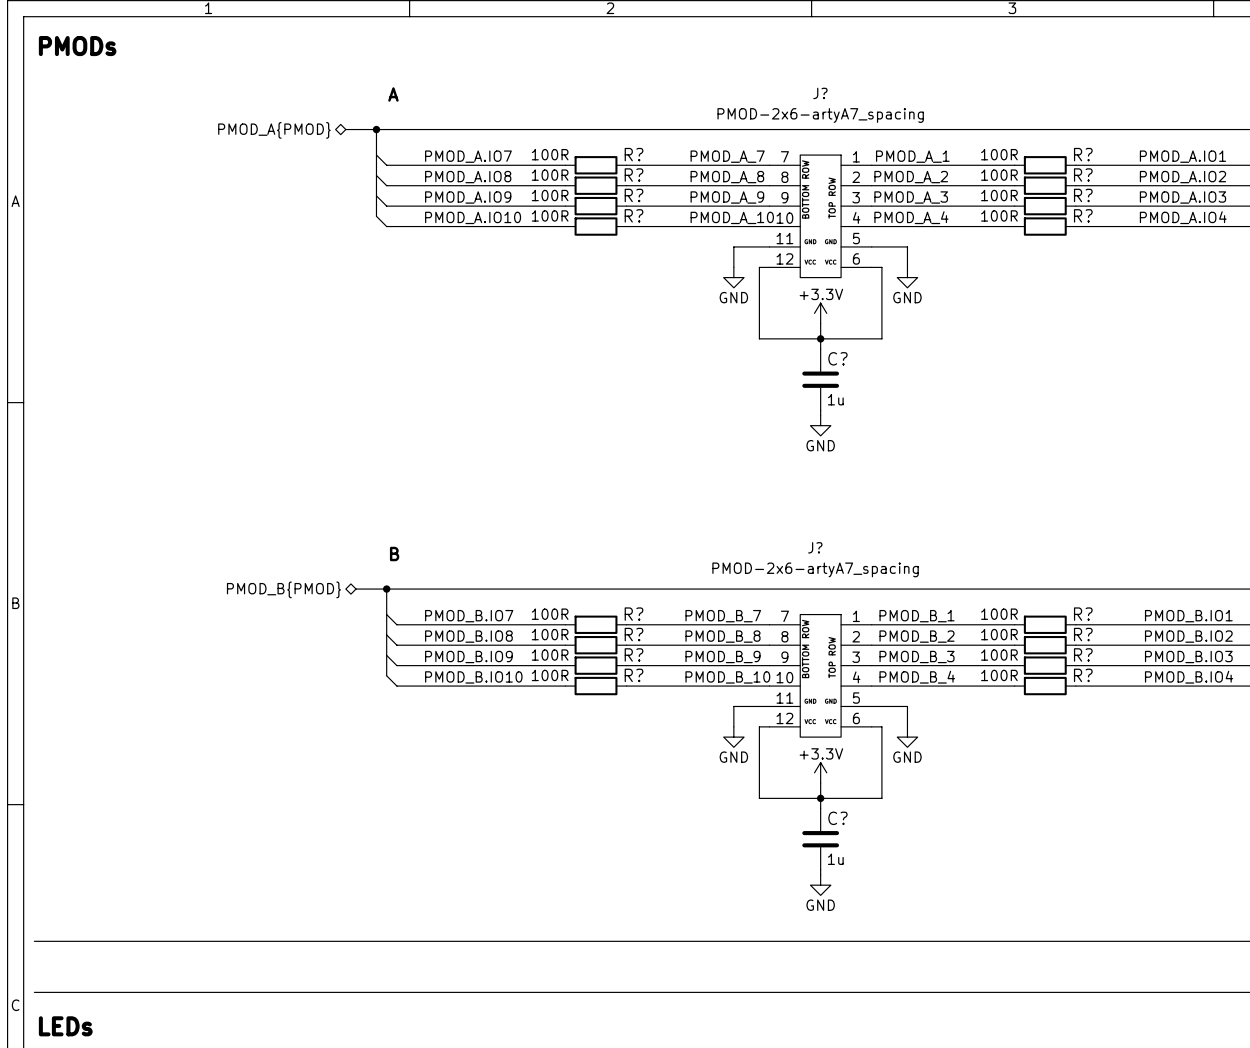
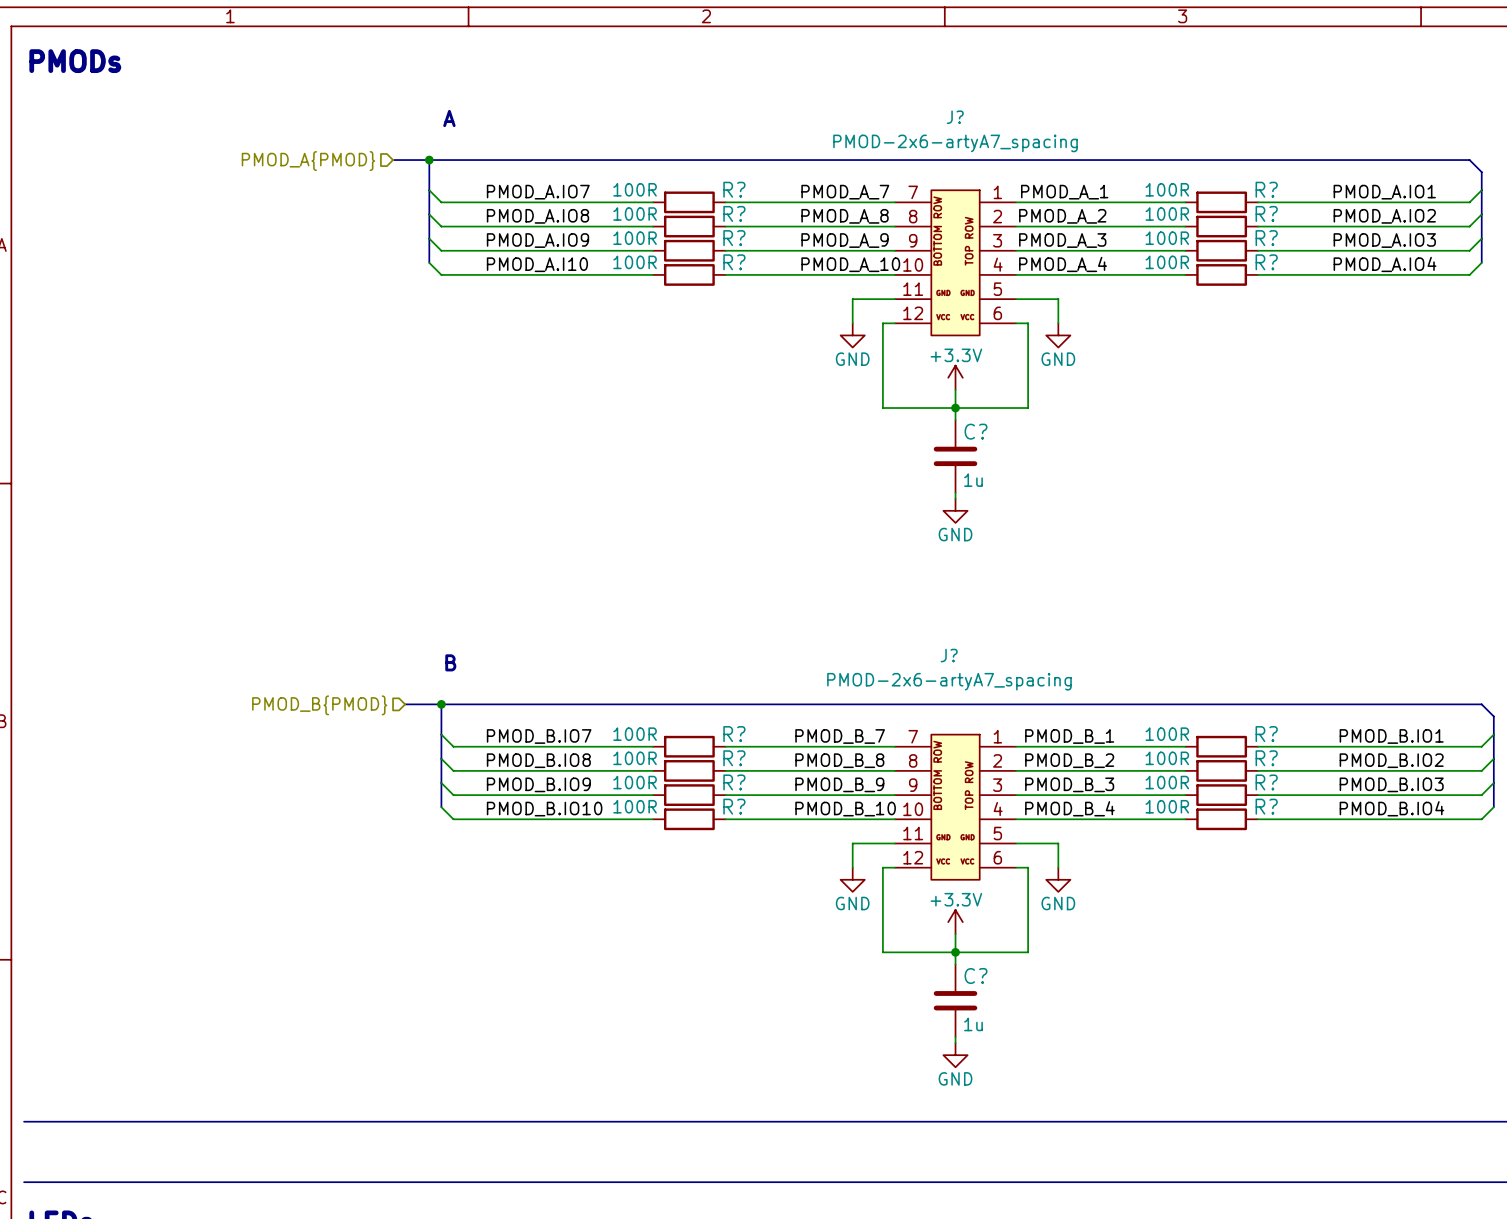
hierarchical label shape: bidirectional (274, 130) -> input (308, 161)
label: PMOD_A.IO10 (473, 217) -> PMOD_A.I10 (537, 264)
hierarchical label shape: bidirectional (283, 589) -> input (319, 705)

